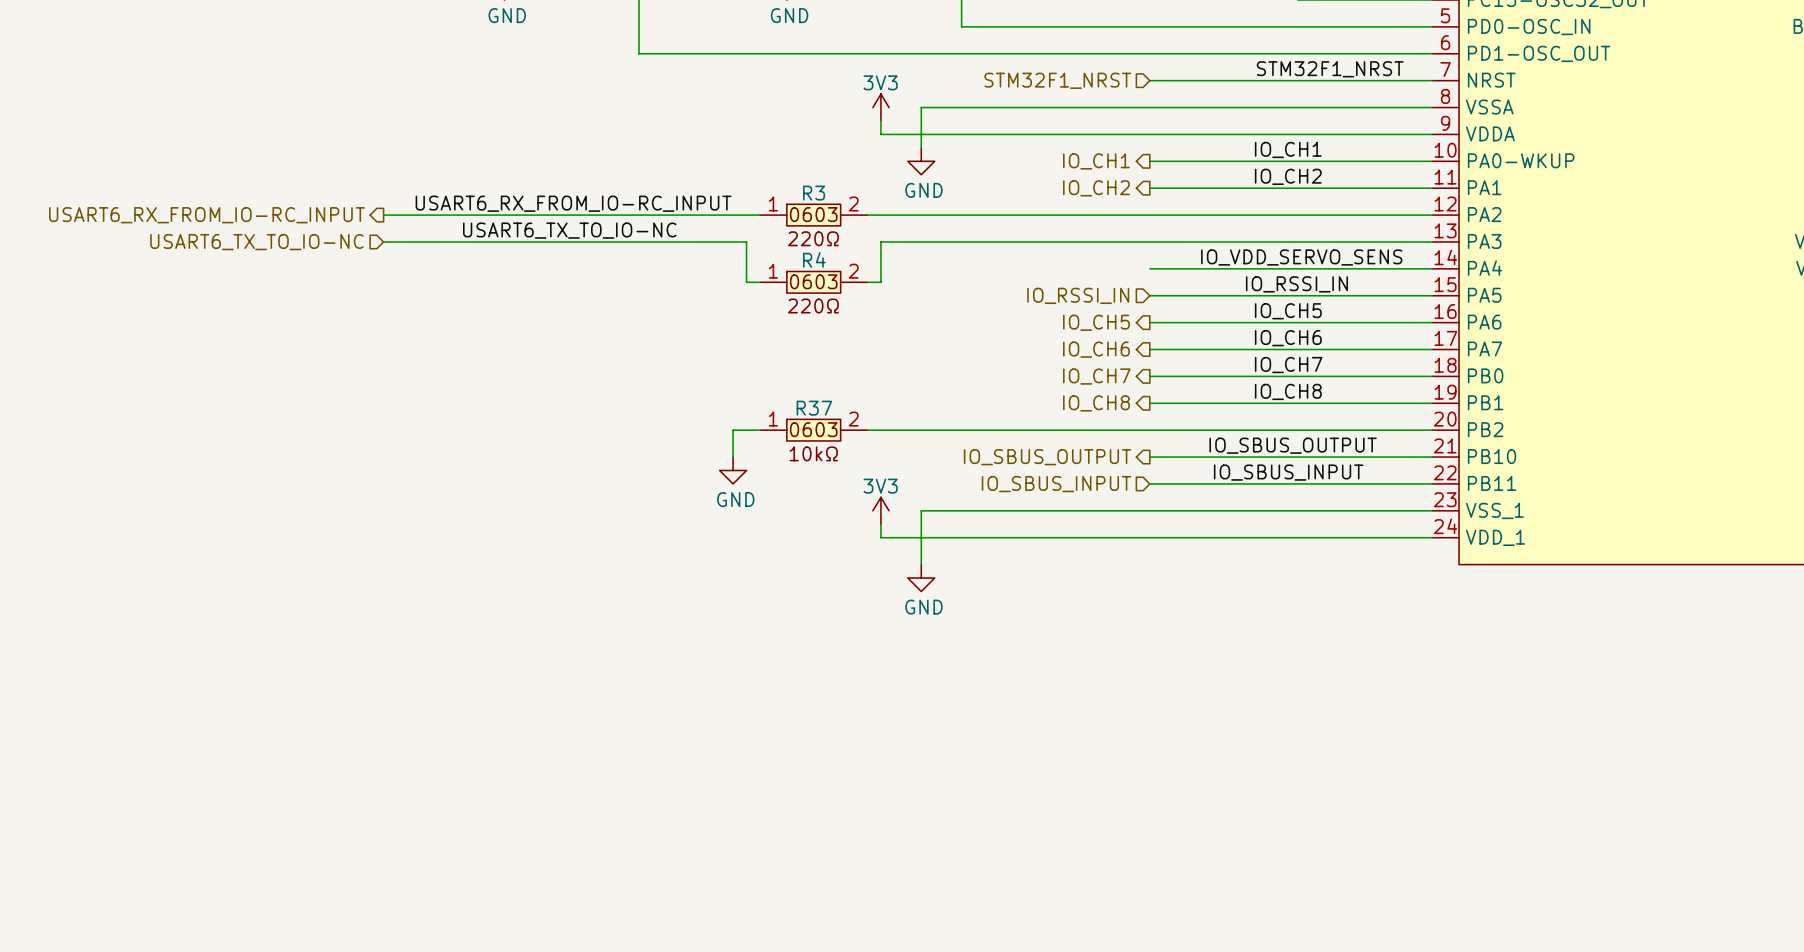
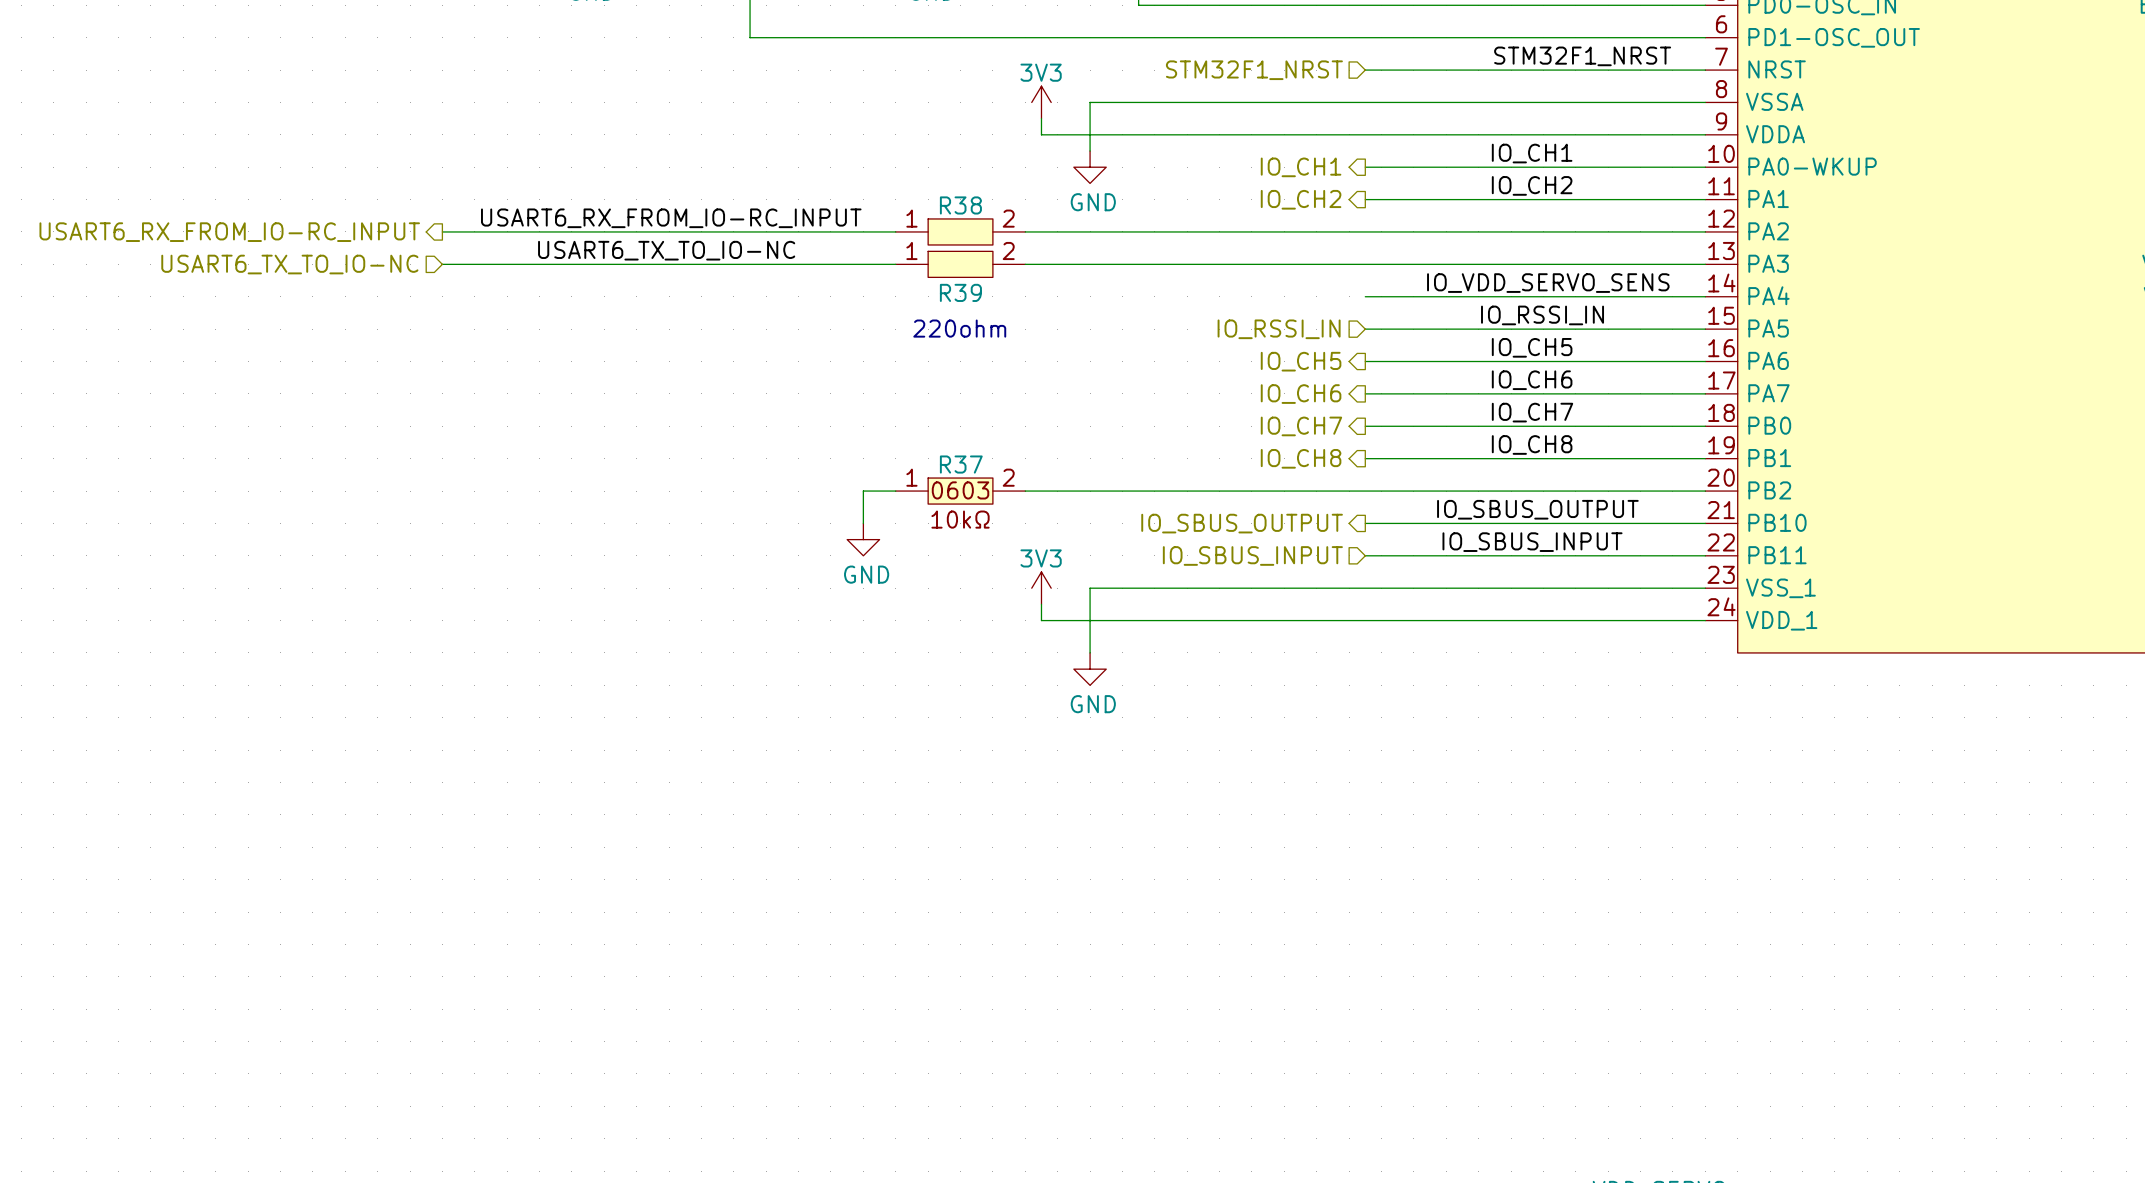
R3 name: R3 (814, 193) -> R38 (960, 205)
R3 text: 0603 (813, 214) -> none
R3 text: 220Ω (813, 238) -> none
wire: (746, 241) (746, 282) (759, 282) -> (879, 264) (895, 264)
R39: none -> (960, 264)
wire: (880, 241) (880, 282) (867, 282) -> (1041, 264) (1025, 264)
R4: (813, 282) -> none
text: none -> 220ohm (959, 328)

